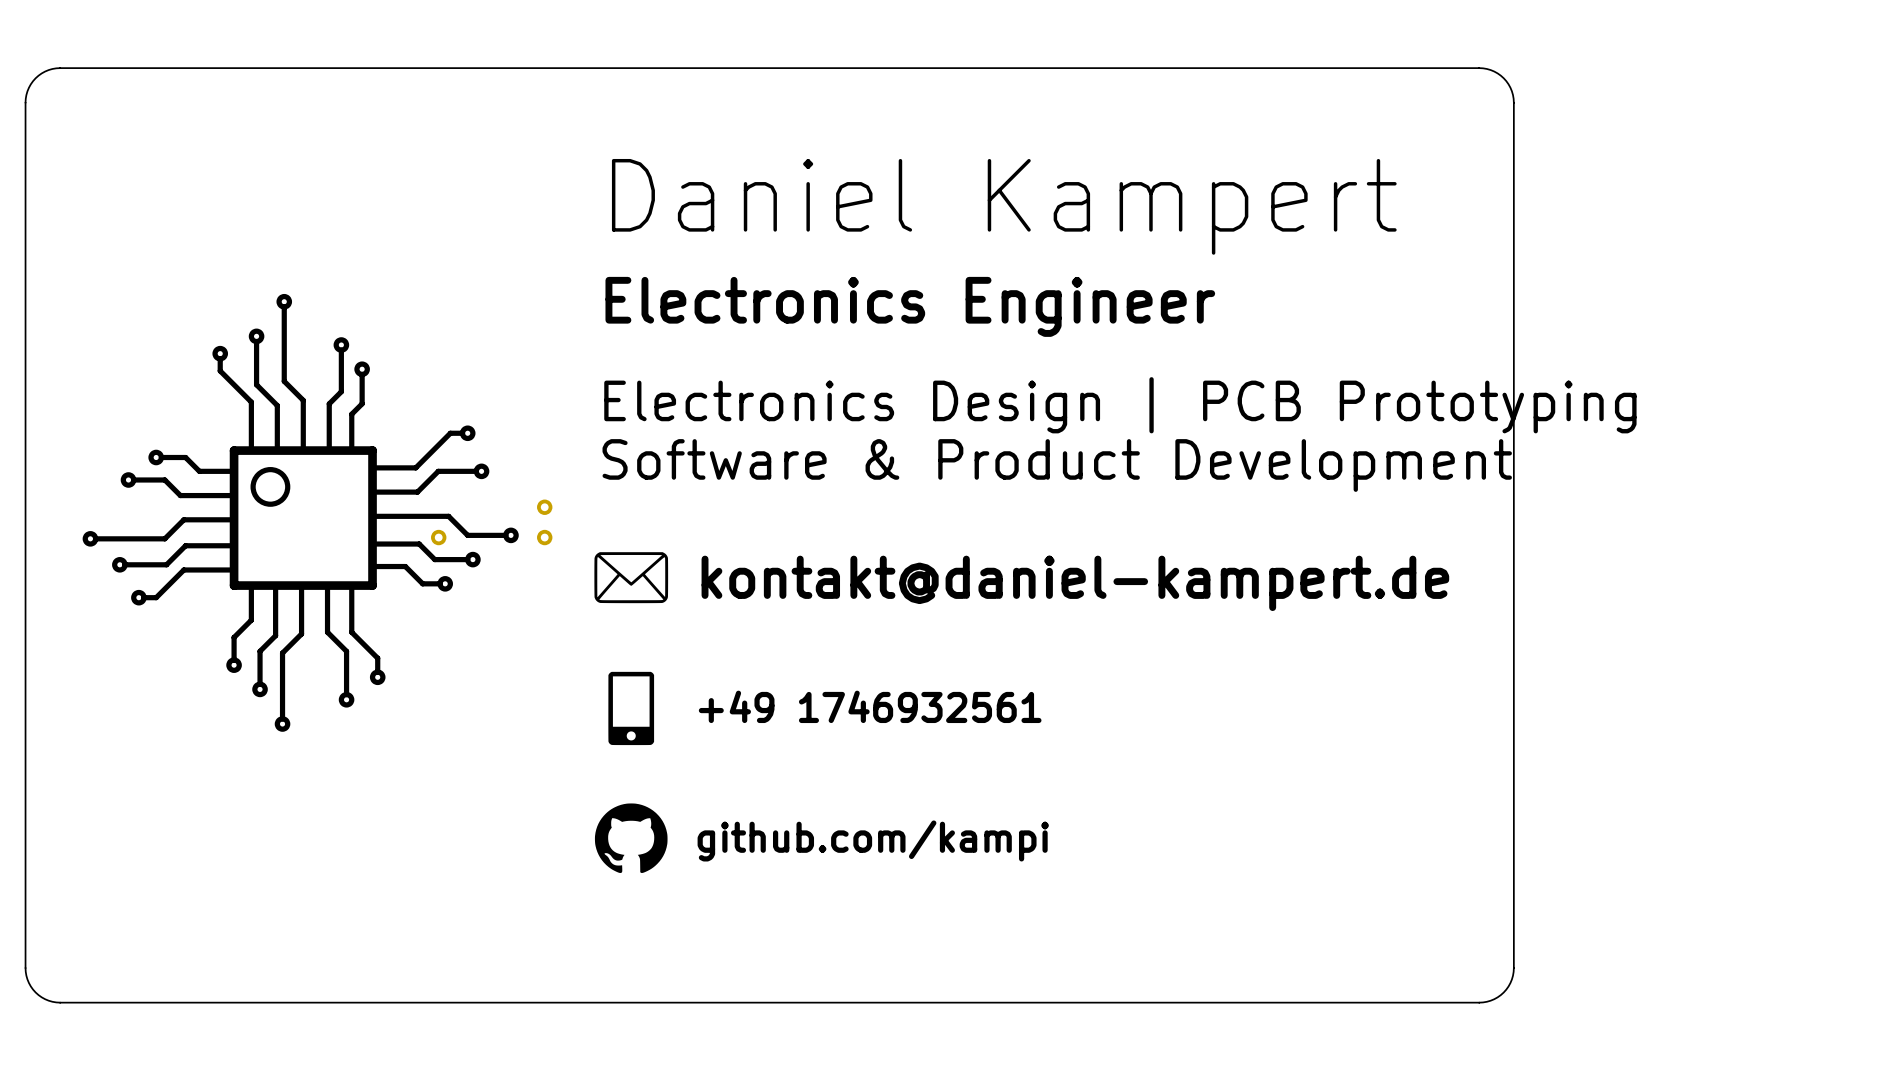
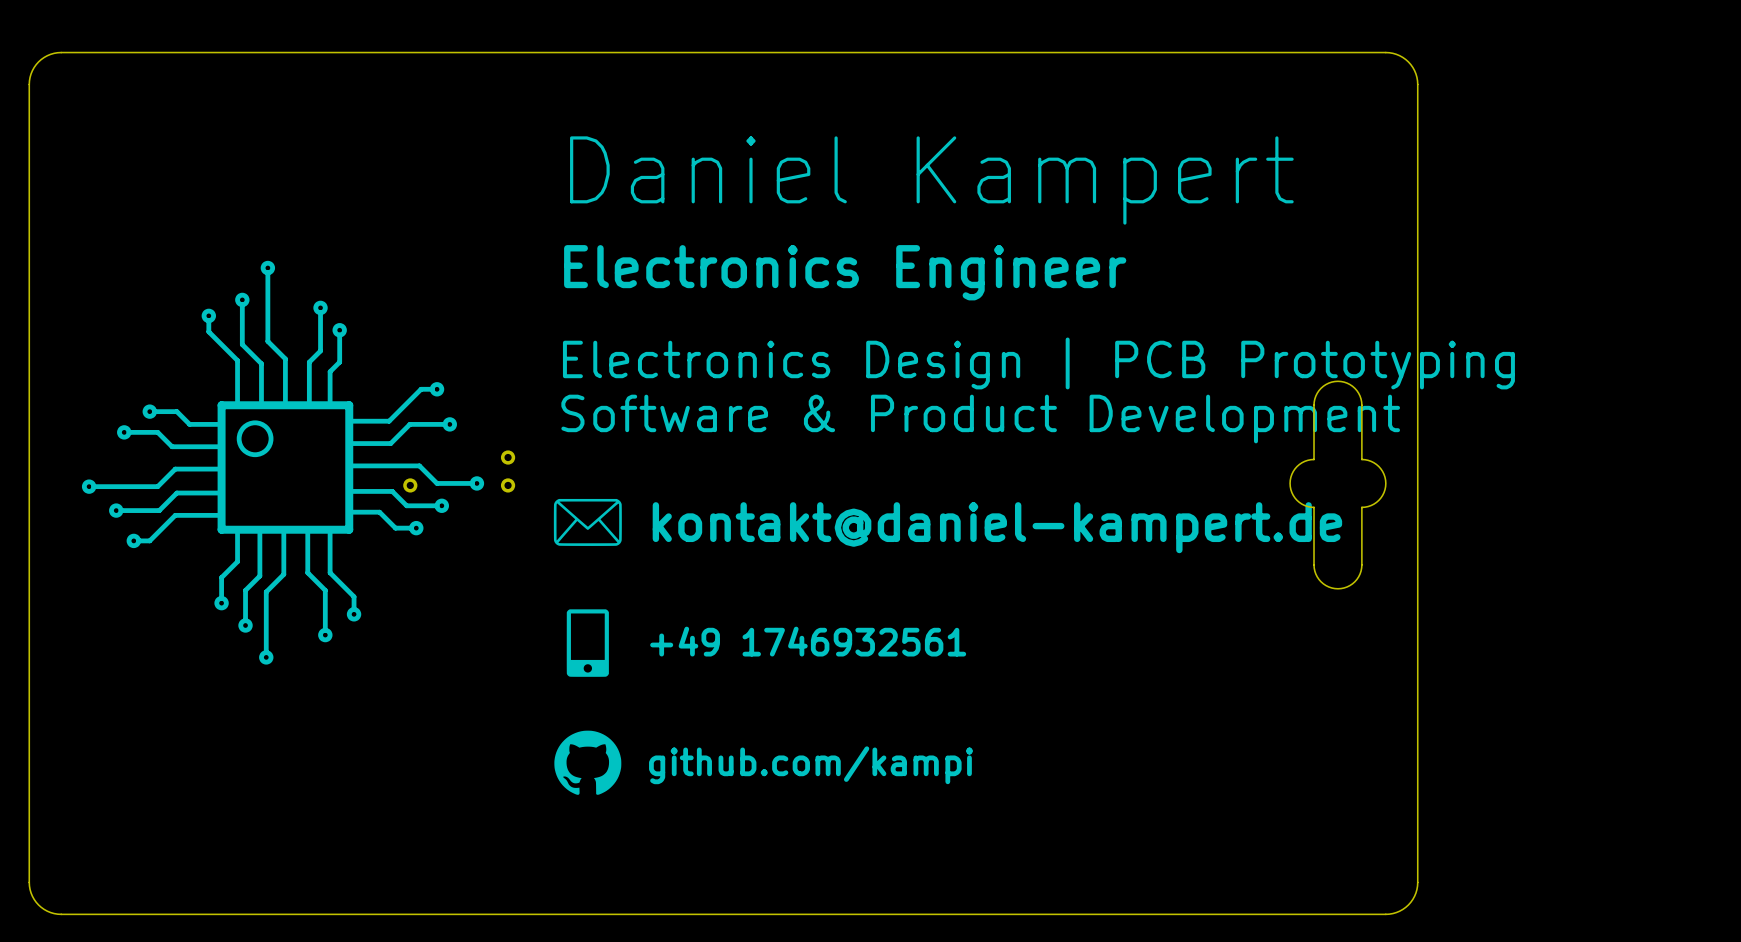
board edge: (1479, 68) (1490, 70) (1503, 78) (1510, 87) (1513, 102) (1513, 968) (1510, 983) (1503, 992) (1494, 999) (1479, 1002) -> (1369, 52) (1389, 52) (1402, 57) (1412, 67) (1417, 84) (1417, 886) (1412, 899) (1402, 909) (1389, 914) (1369, 914)
board edge: none -> (1361, 405) (1361, 459) (1371, 461) (1380, 468) (1385, 477) (1385, 486) (1382, 495) (1376, 502) (1361, 507) (1361, 564) (1358, 576) (1347, 586) (1334, 588) (1323, 583) (1315, 574) (1314, 564) (1314, 507) (1304, 505) (1295, 498) (1290, 489) (1290, 480) (1293, 471) (1299, 464) (1314, 459) (1314, 402) (1321, 388) (1334, 381) (1347, 383) (1358, 393) (1361, 405)

